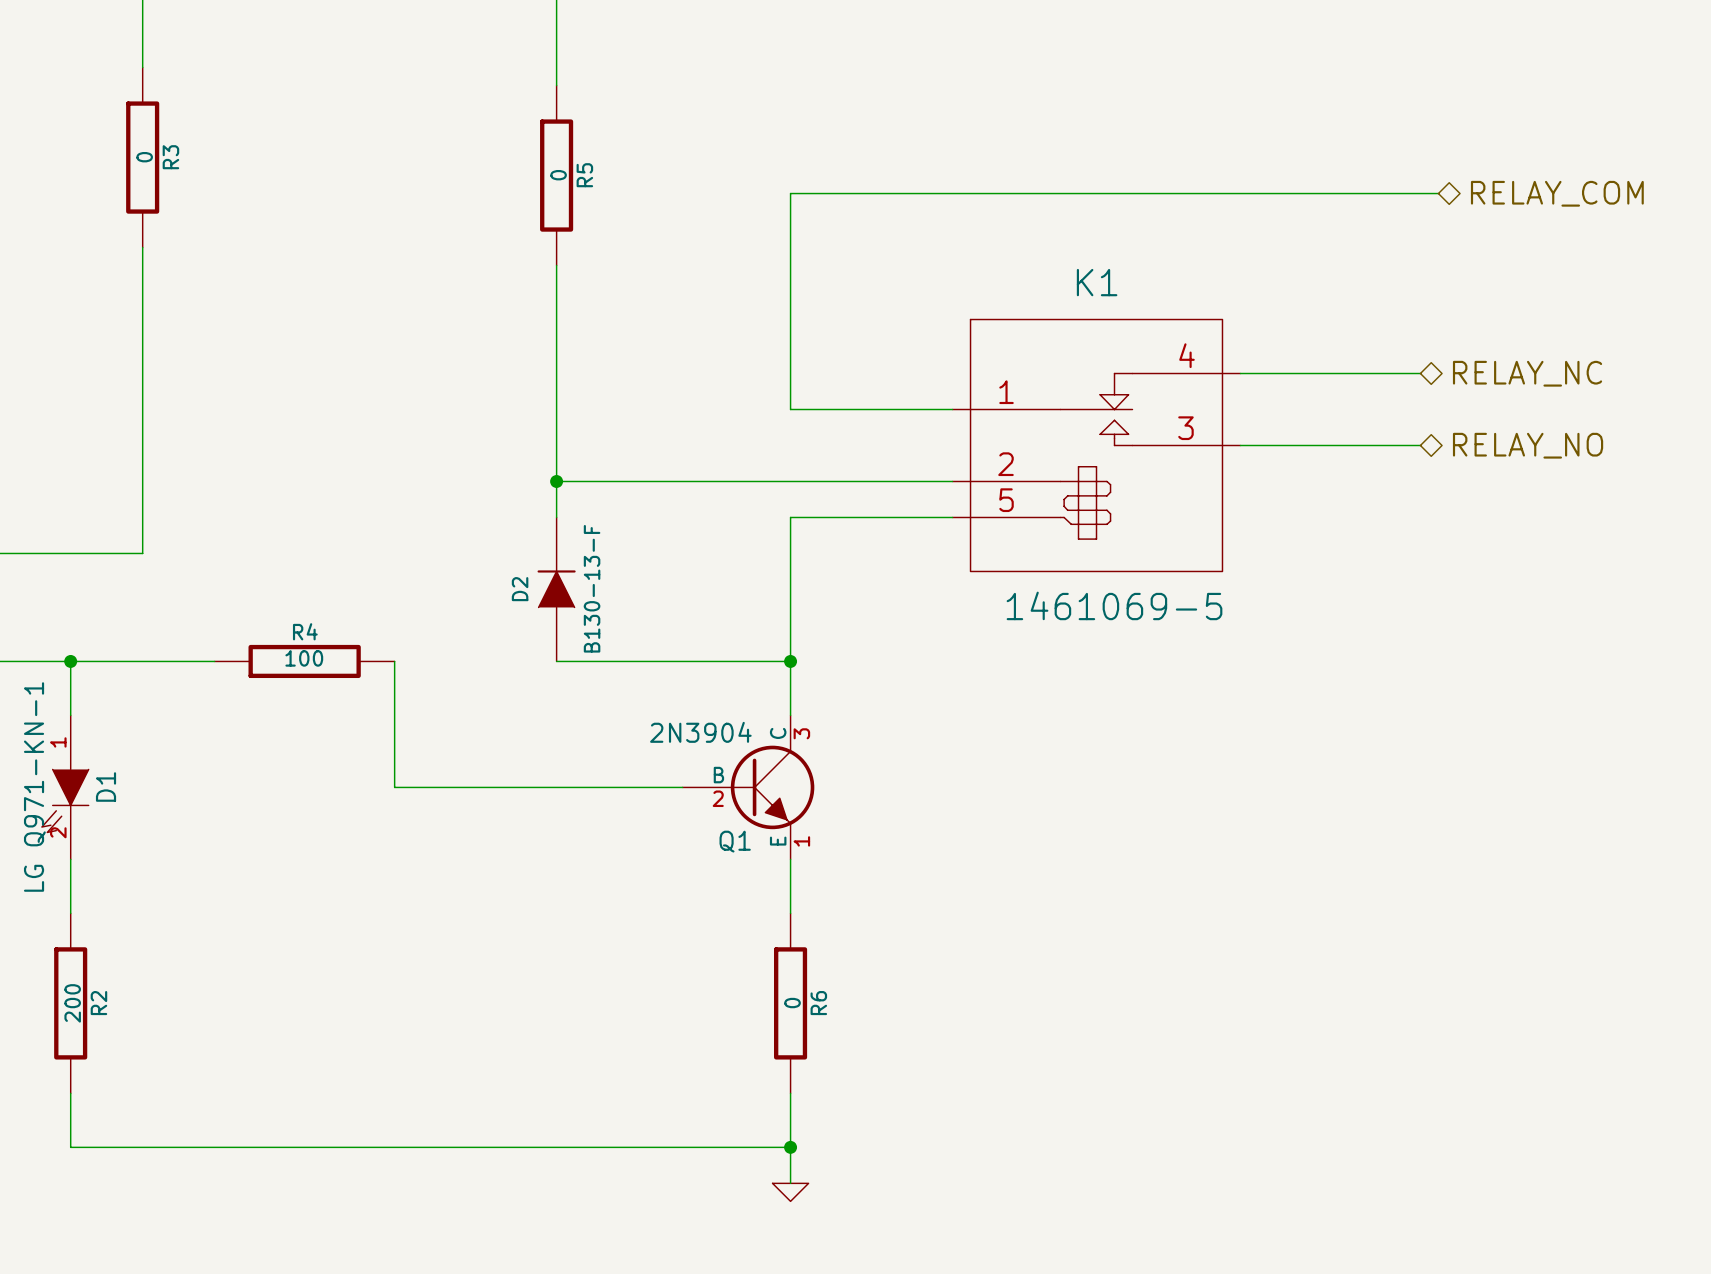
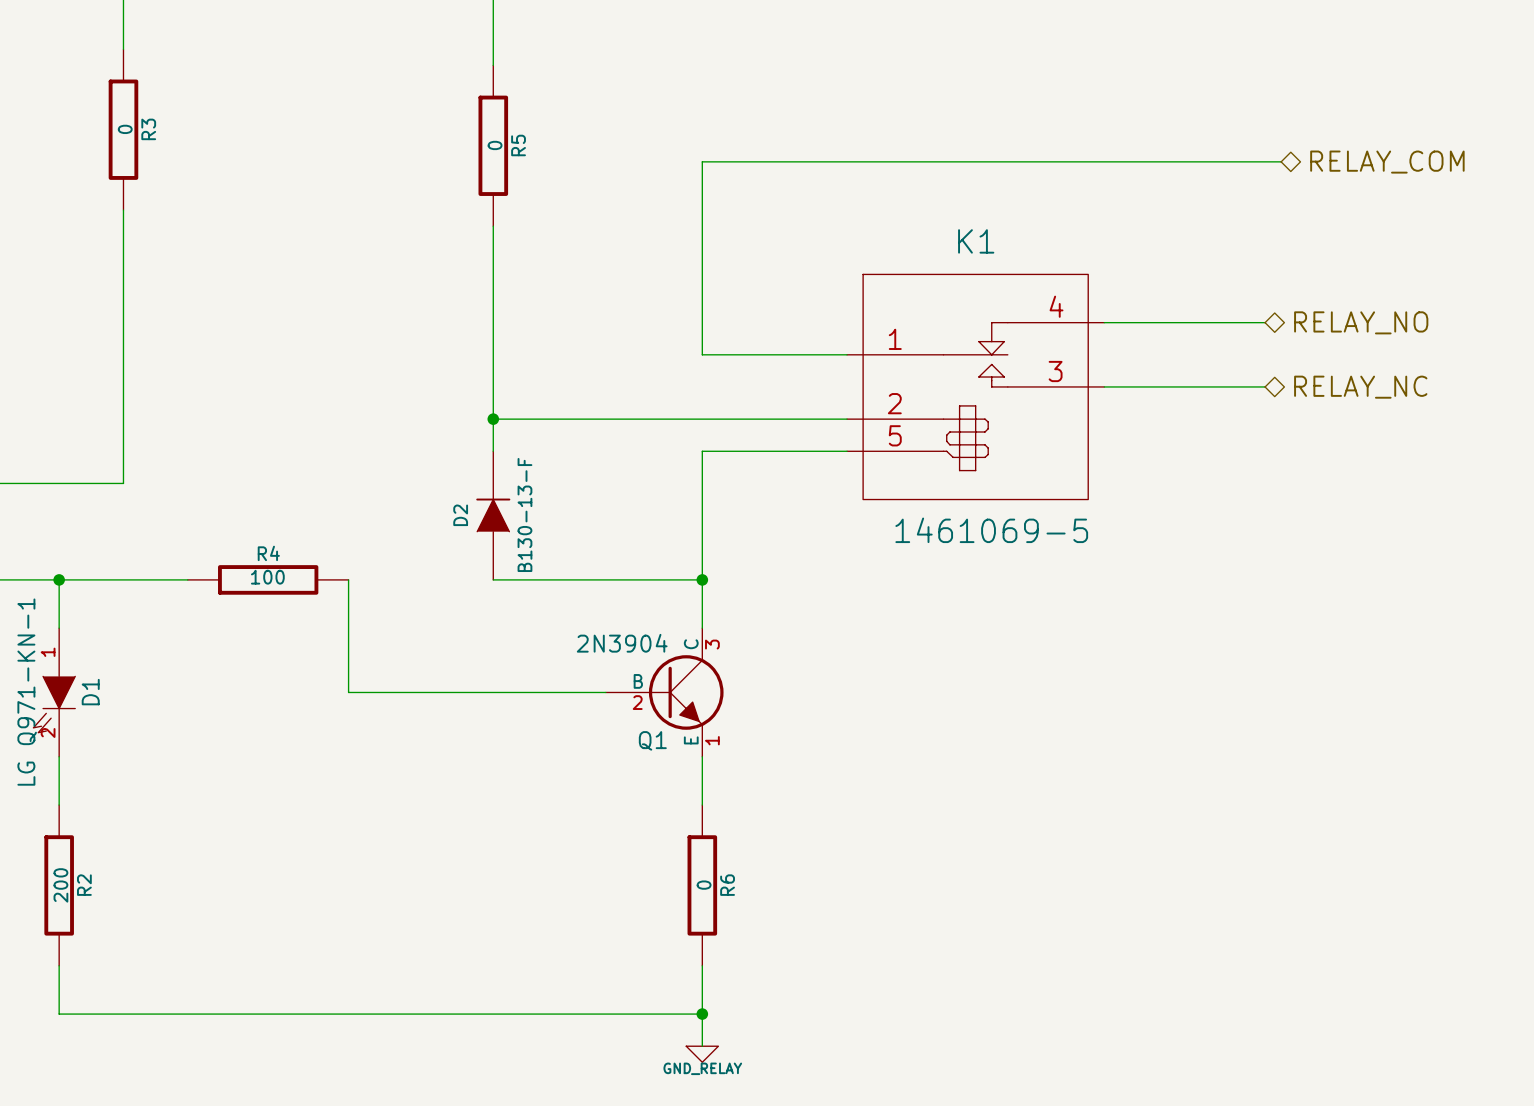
hierarchical label: RELAY_NC (1527, 373) -> RELAY_NO (1361, 322)
hierarchical label: RELAY_NO (1528, 445) -> RELAY_NC (1360, 387)
power symbol text: none -> GND_RELAY (702, 1068)

